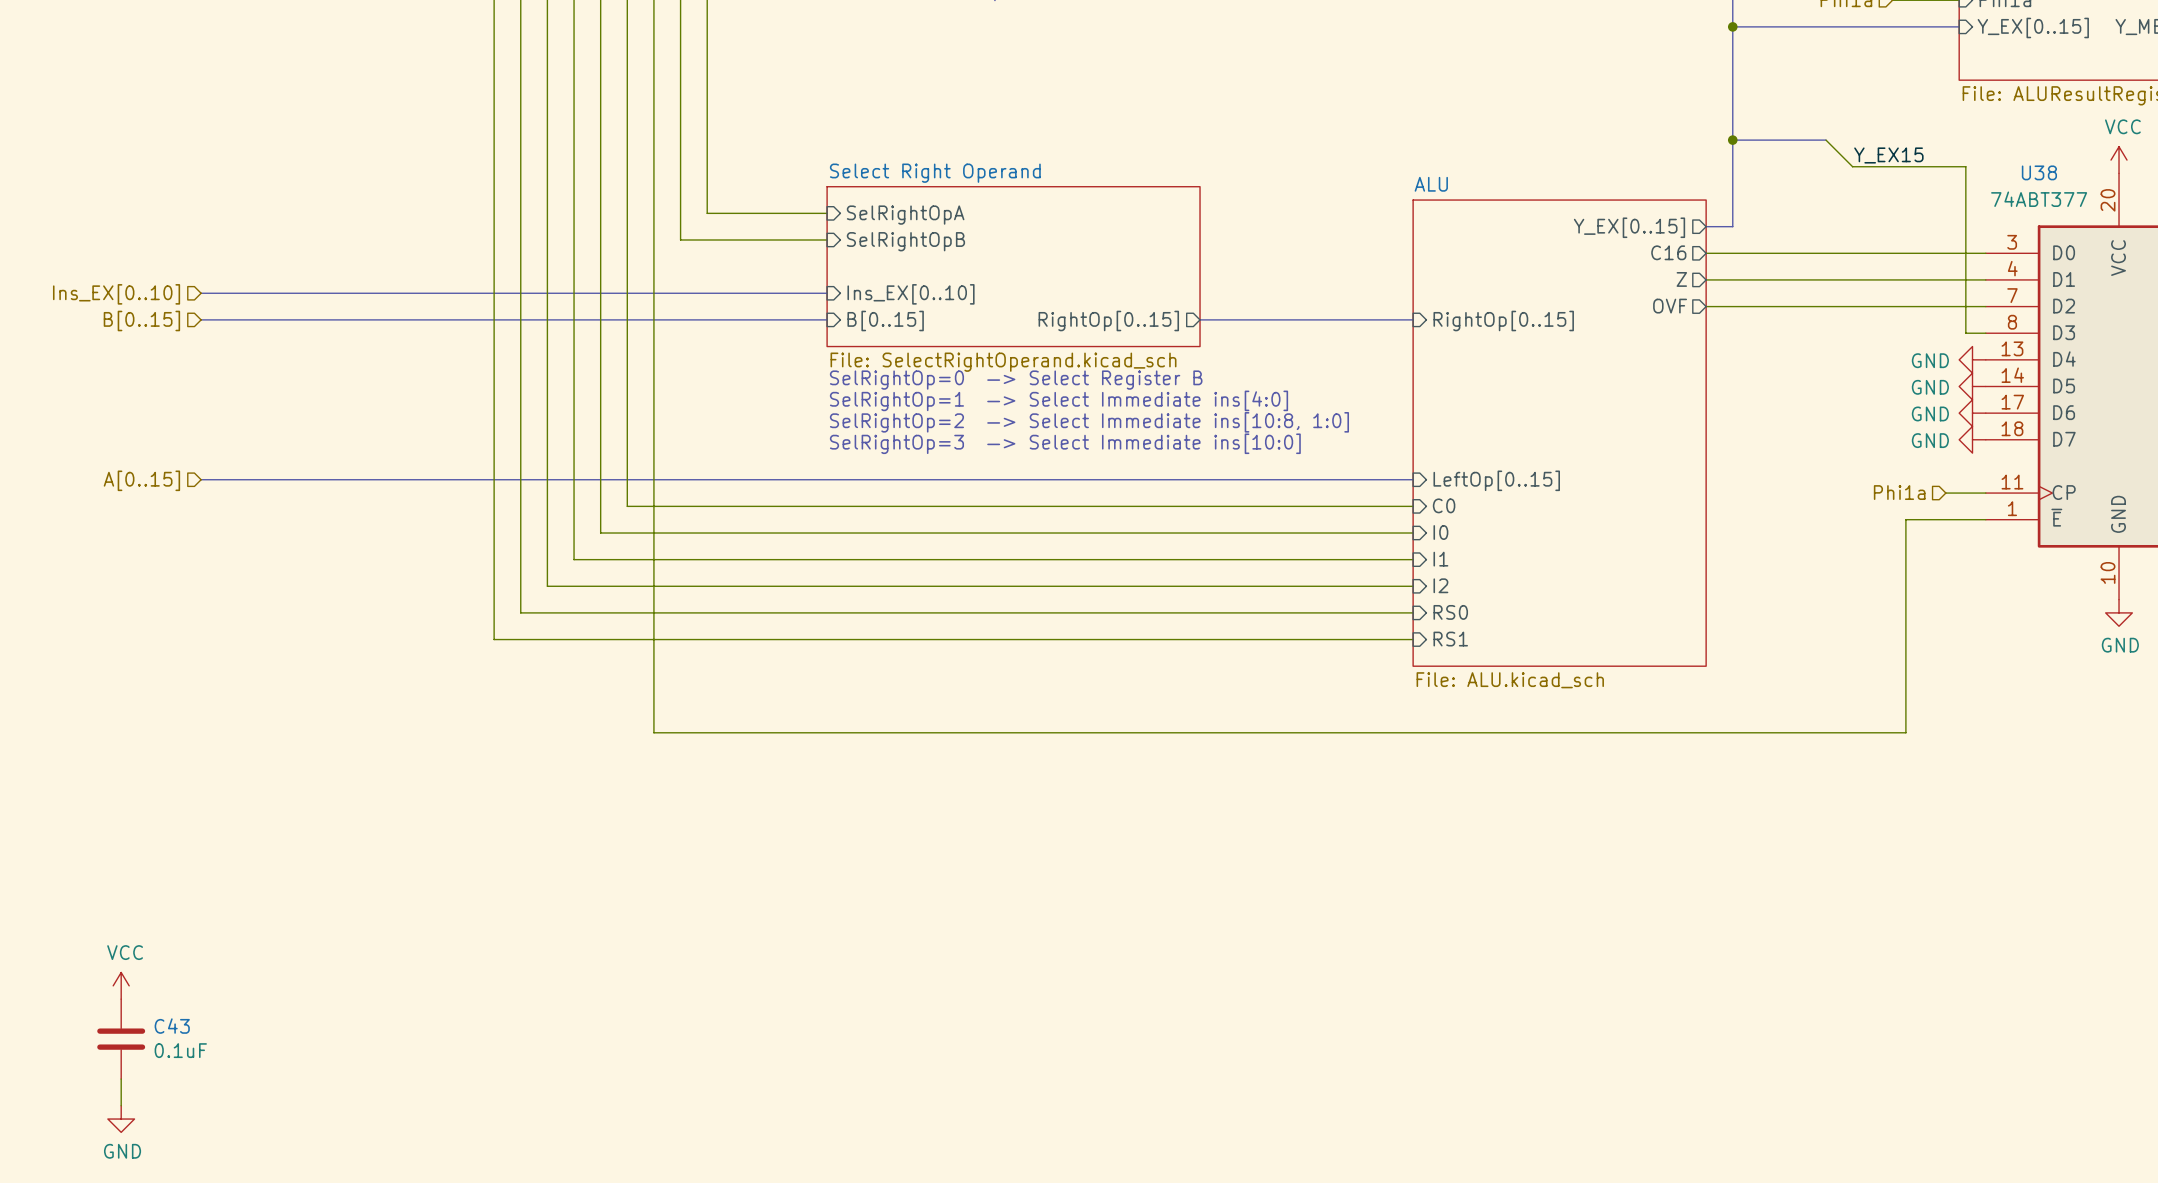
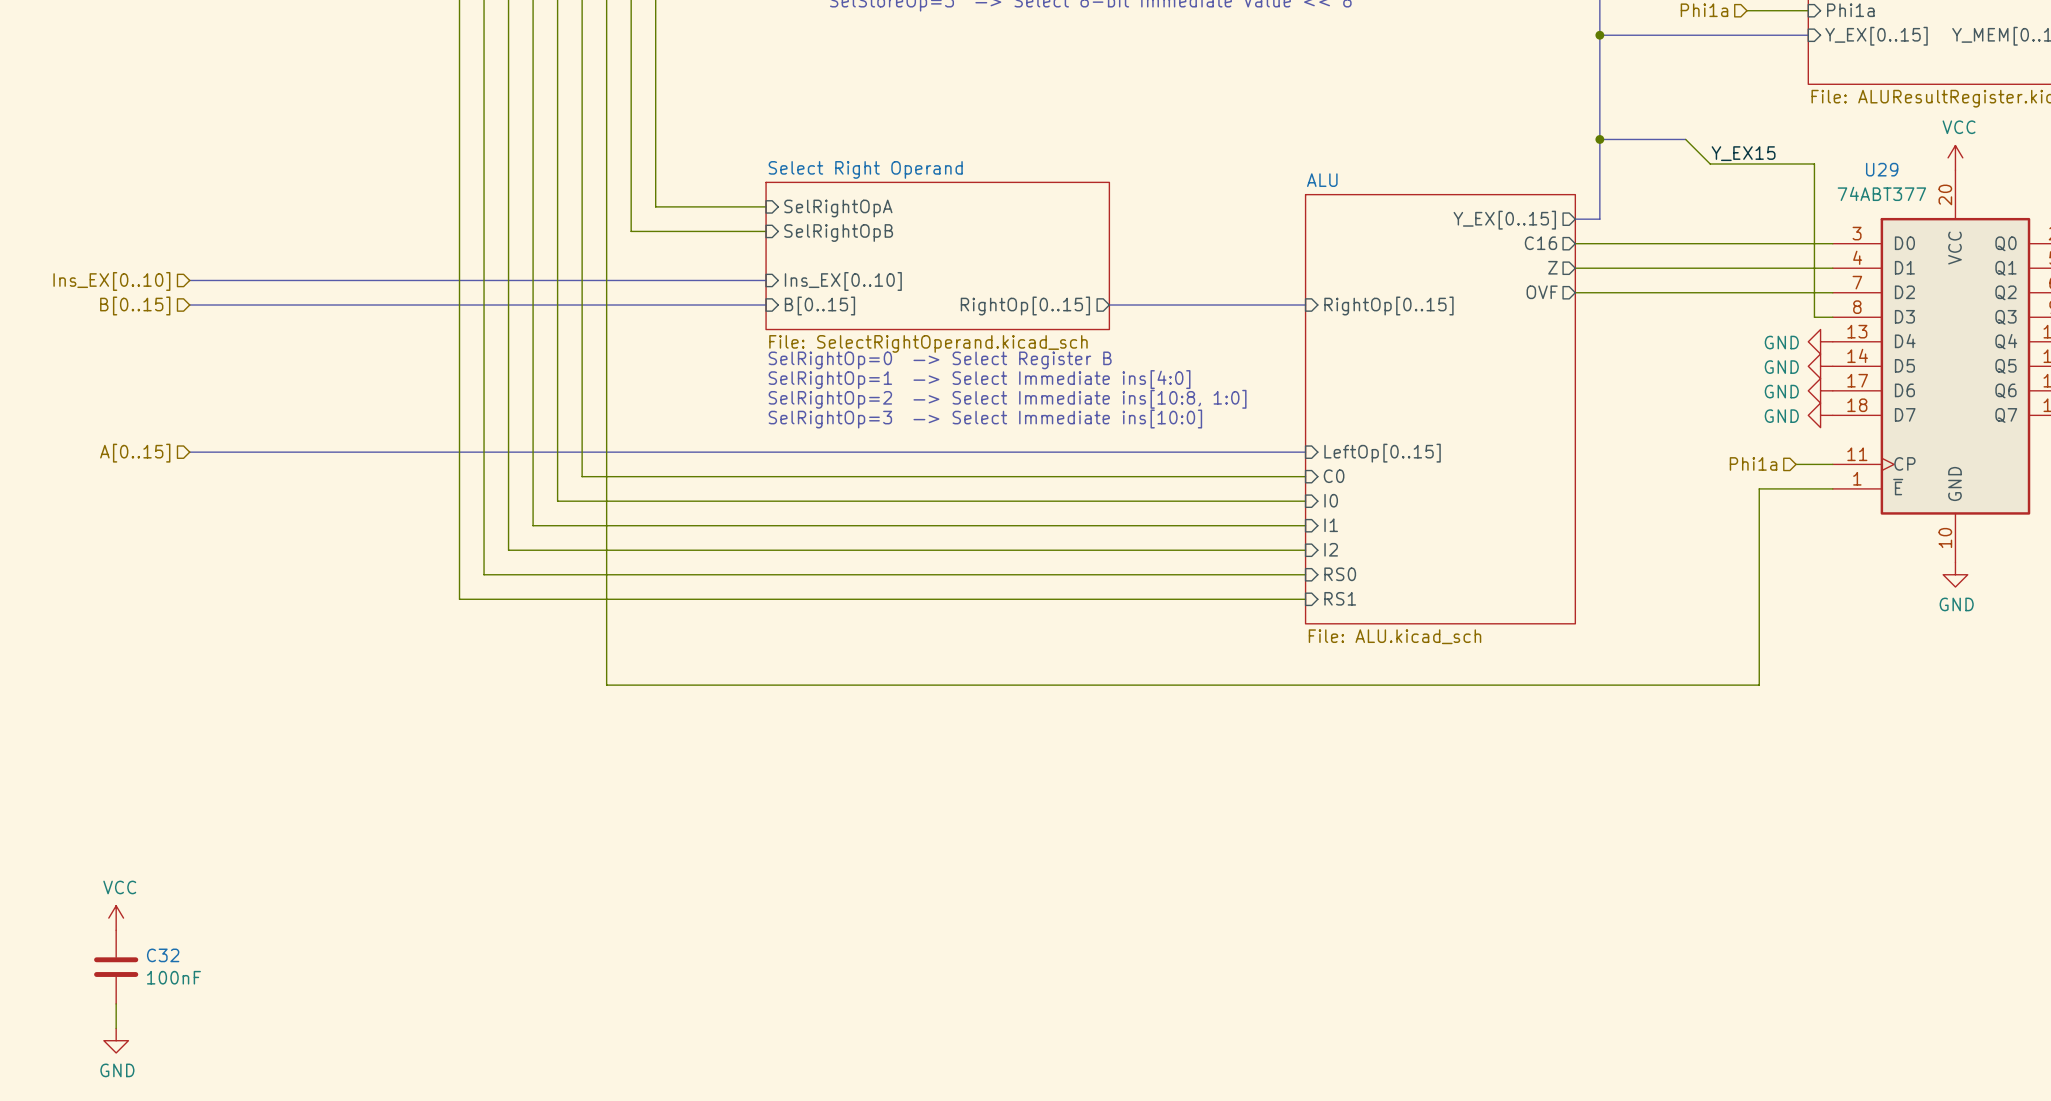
U38 name: U38 (2039, 172) -> U29 (1882, 169)
C43 name: C43 (172, 1026) -> C32 (163, 955)
C43 value: 0.1uF (180, 1050) -> 100nF (173, 977)

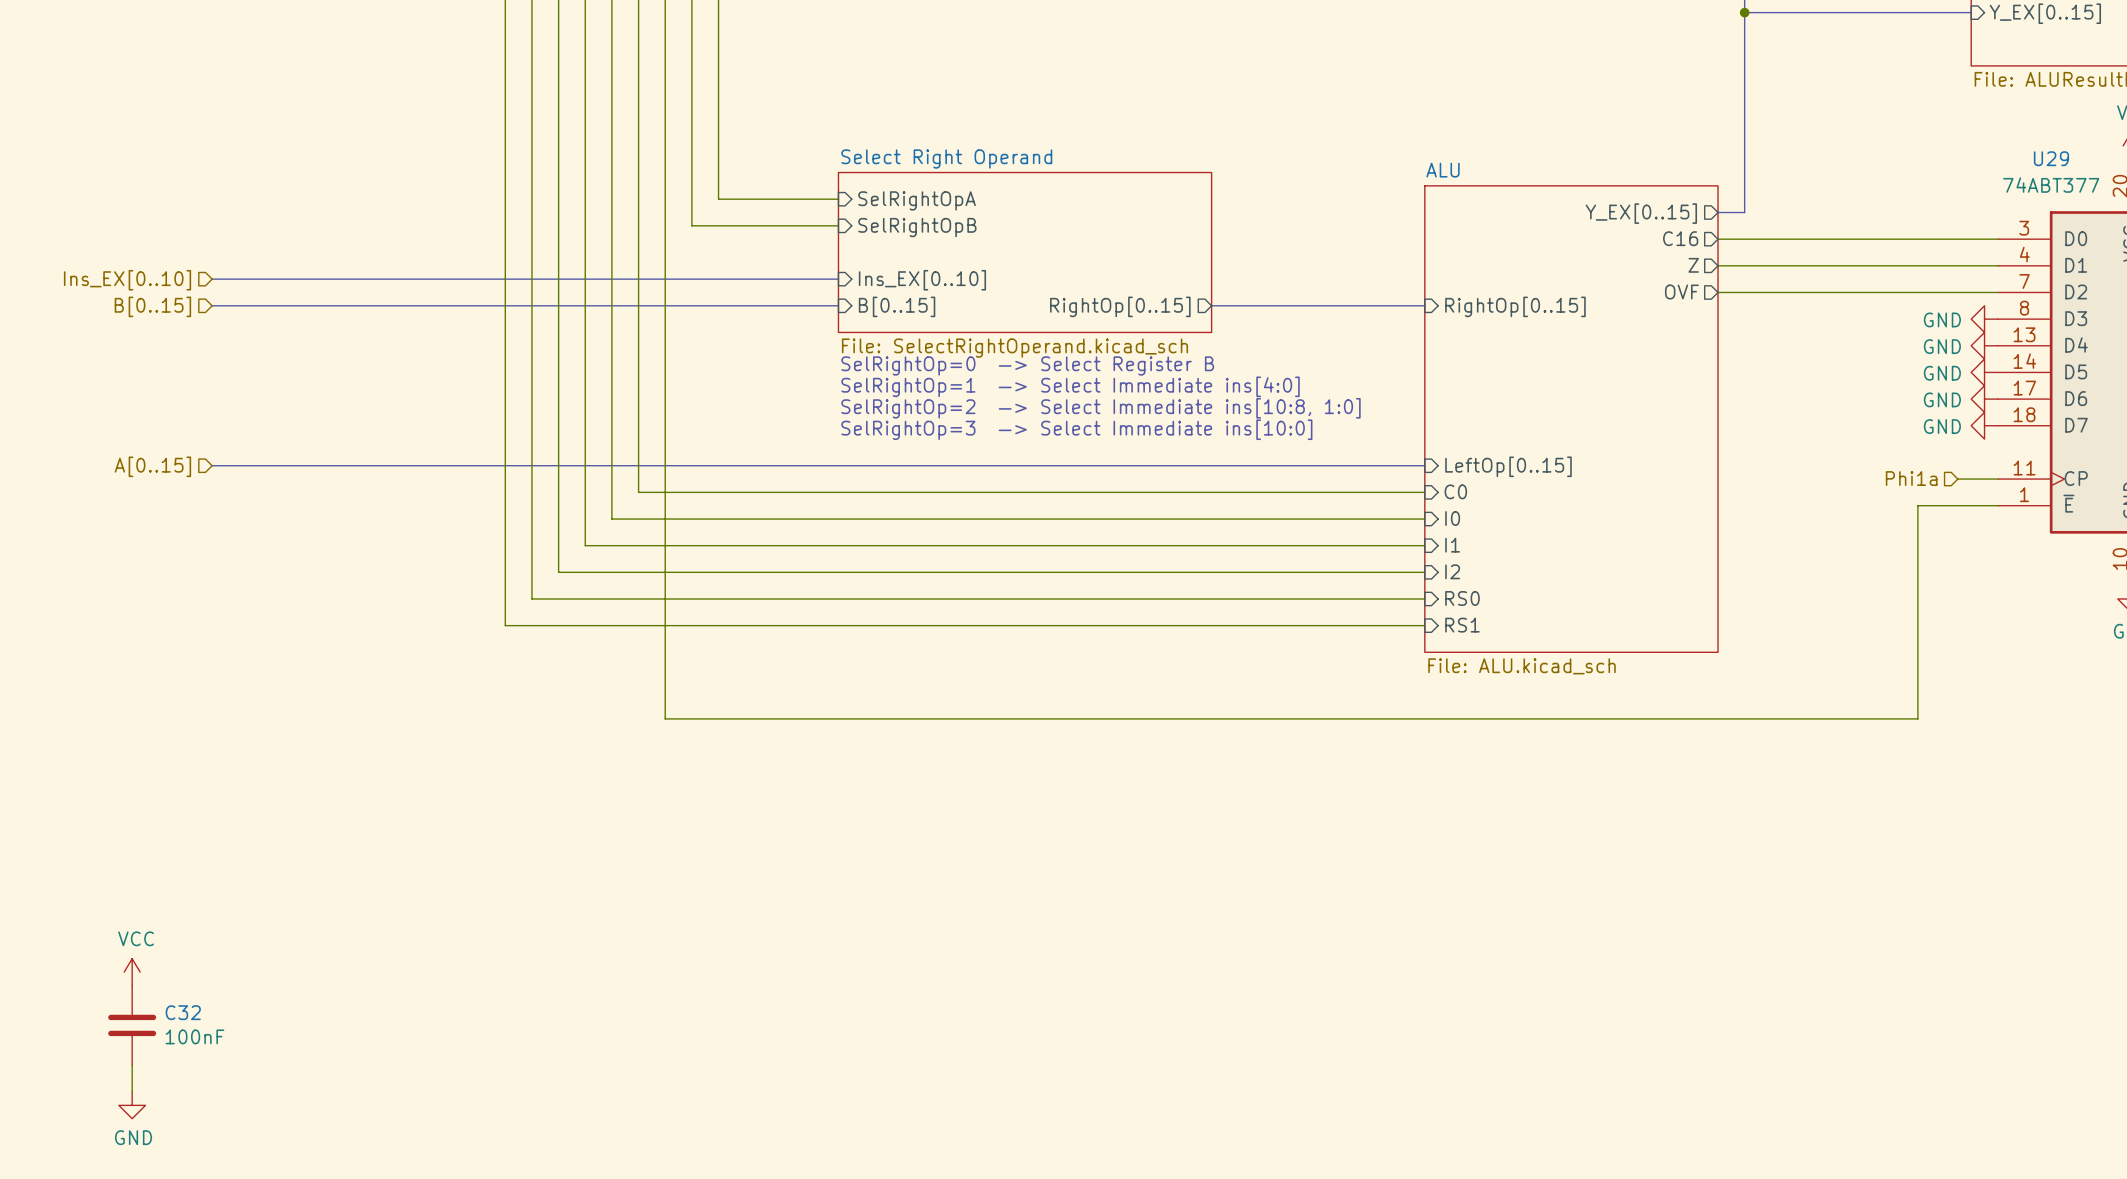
bus: (1599, 139) (1685, 139) -> none
junction: (1599, 139) -> none
wire: (1685, 139) (1710, 163) (1814, 163) (1814, 317) (1832, 317) -> none
label: Y_EX15 (1743, 153) -> none
power symbol: none -> GND (1984, 319)

